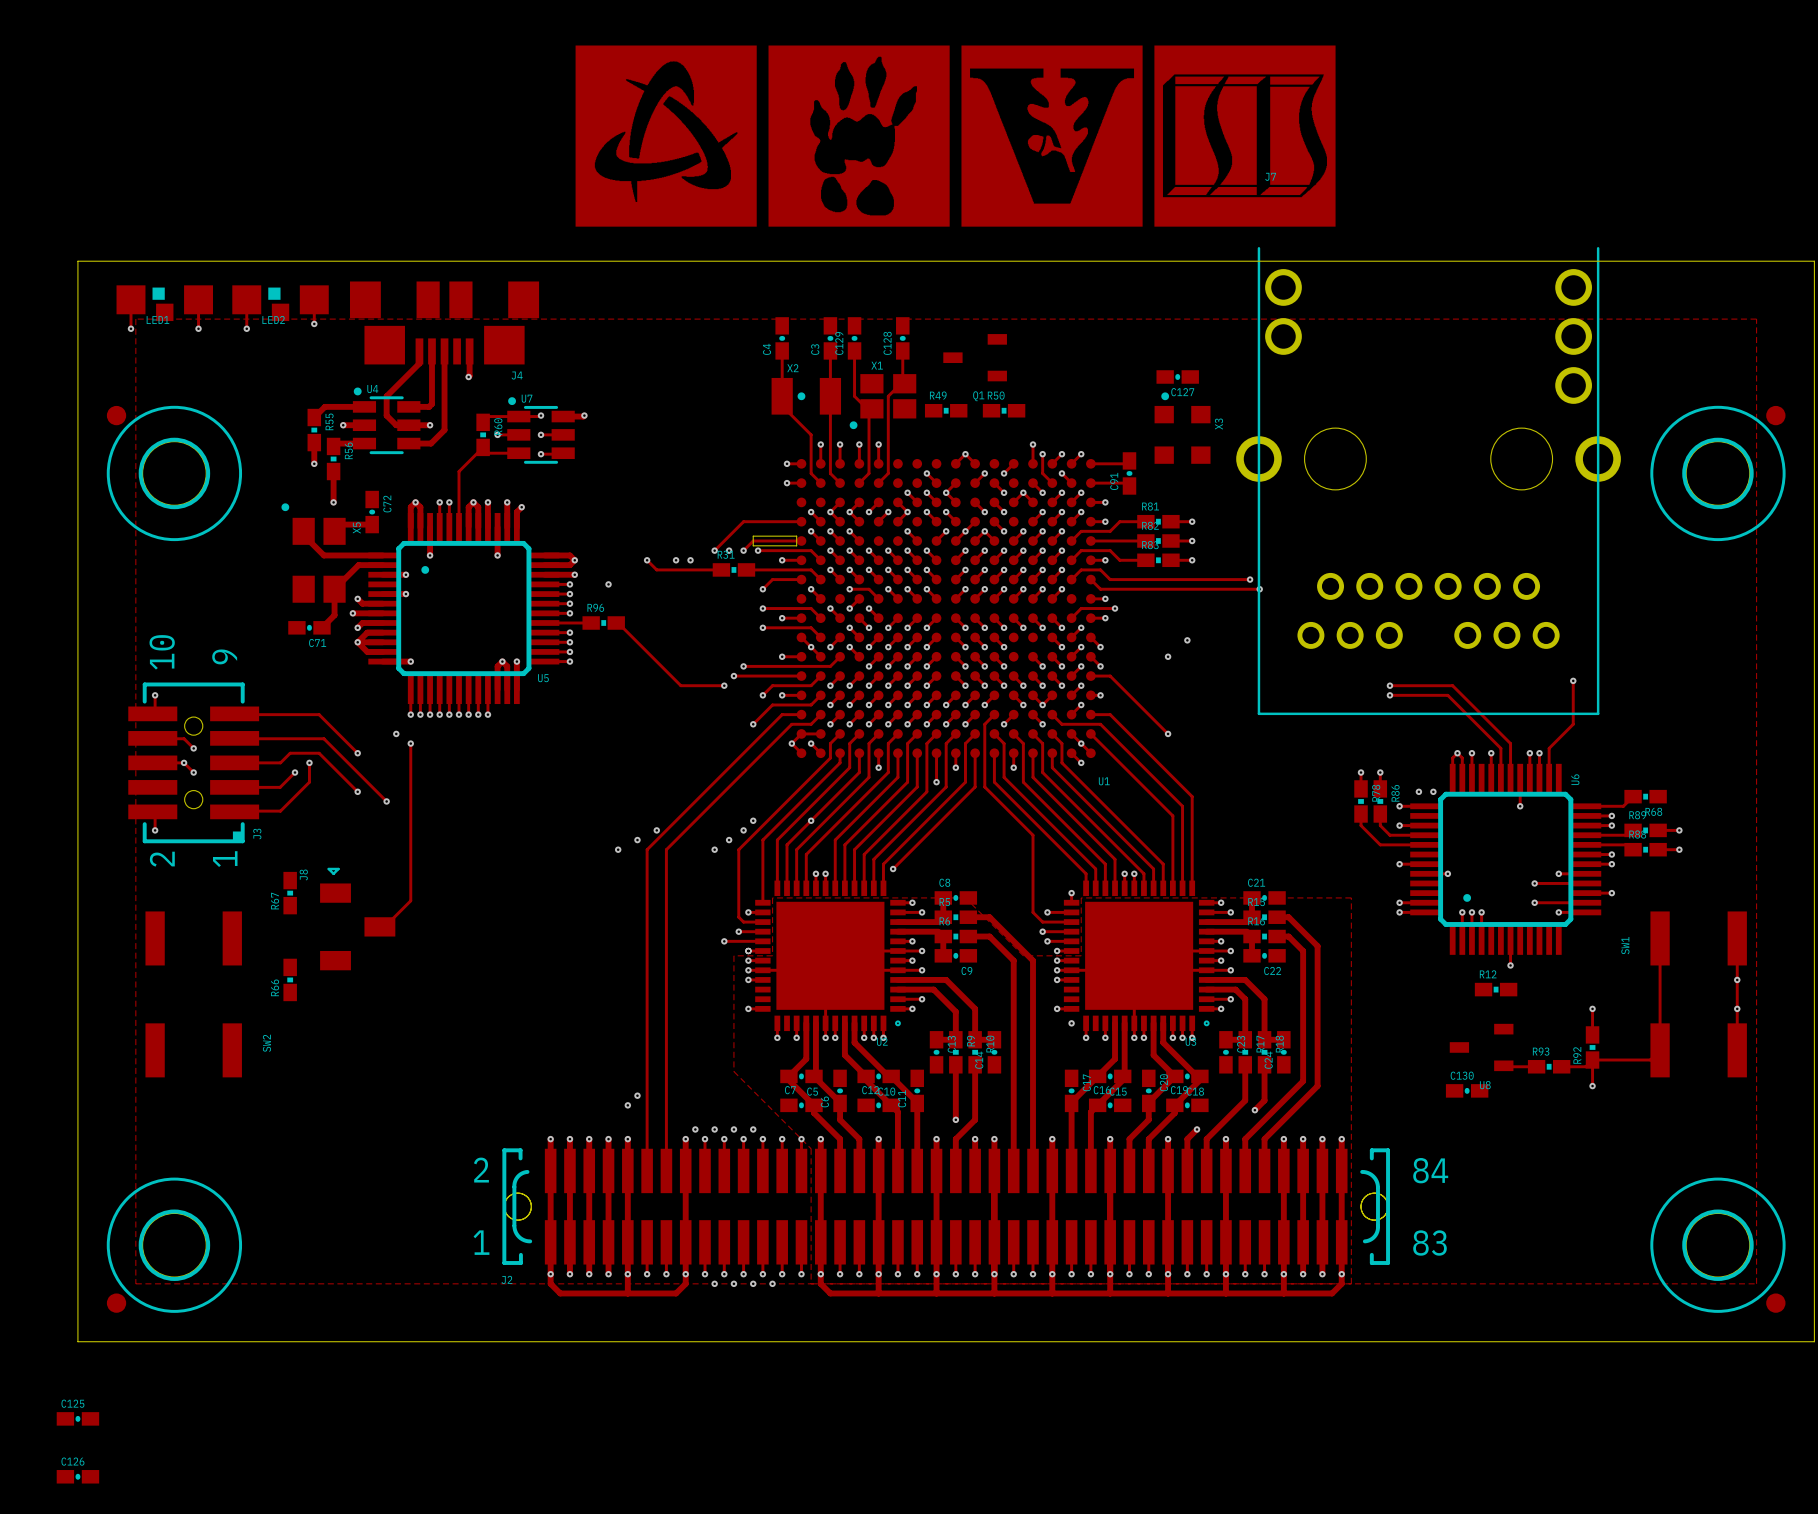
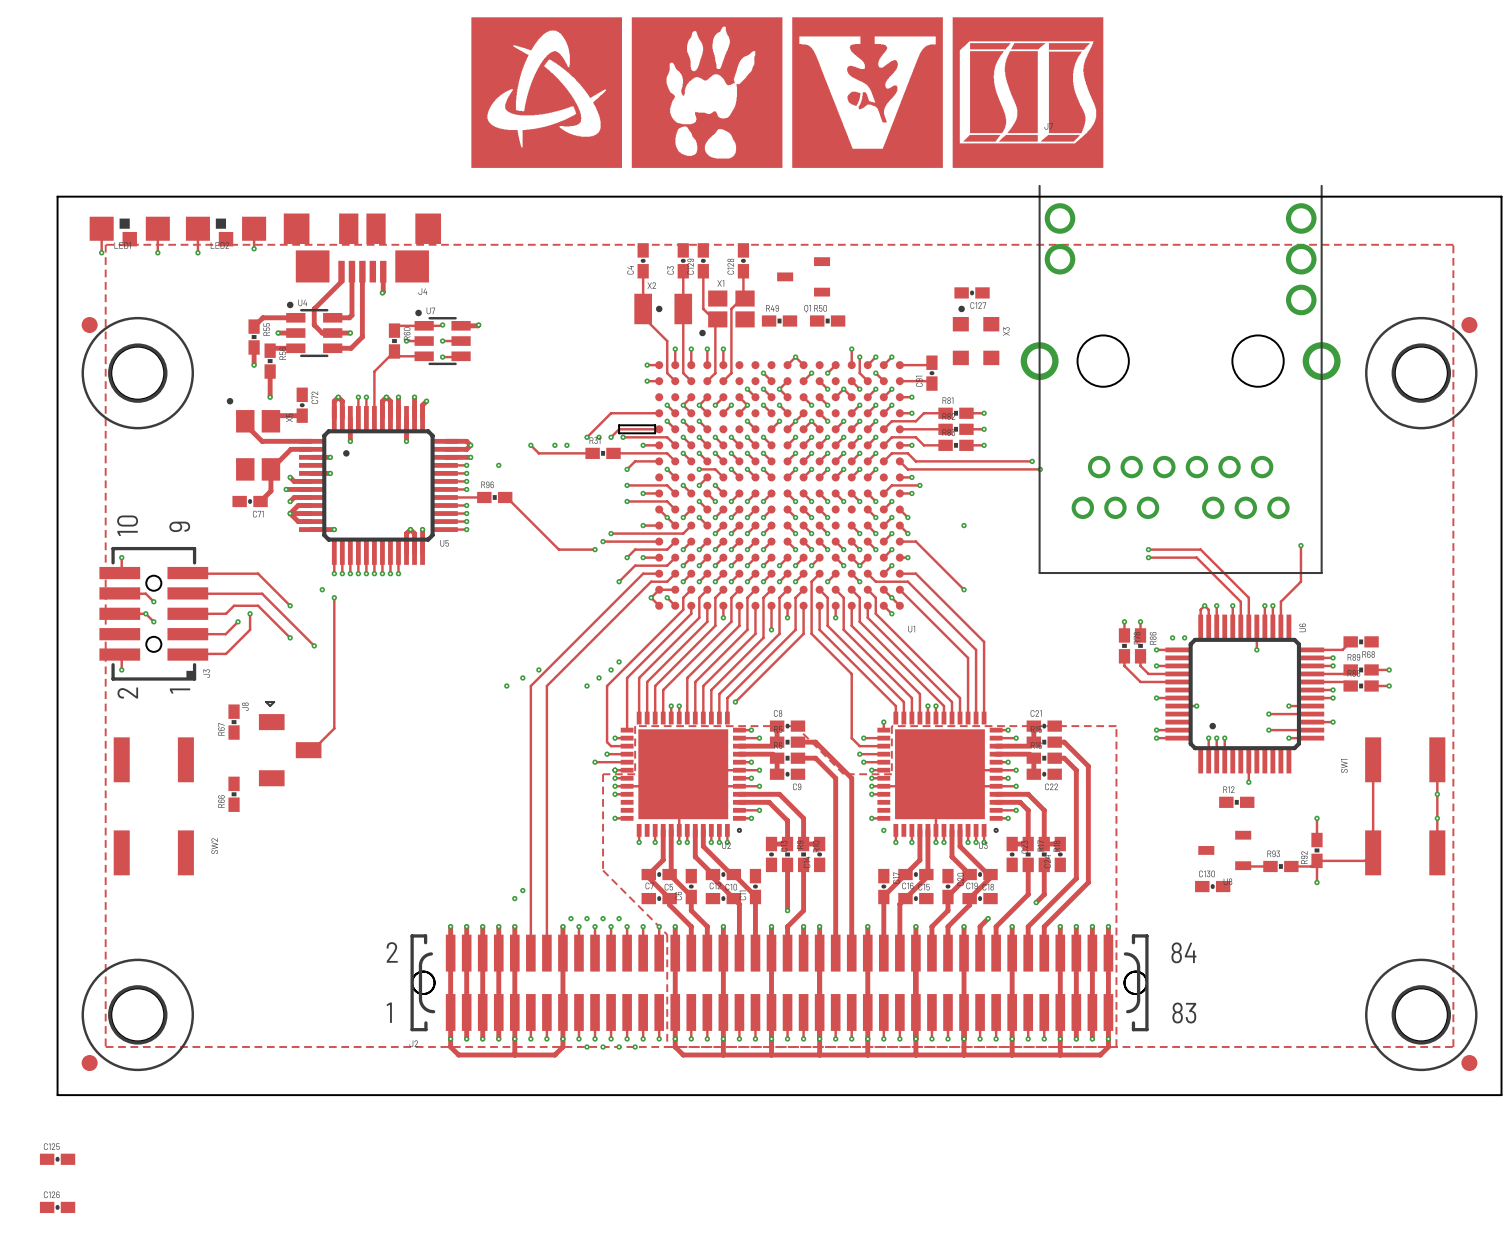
via: (1187, 640) -> none
via: (811, 820) -> none

